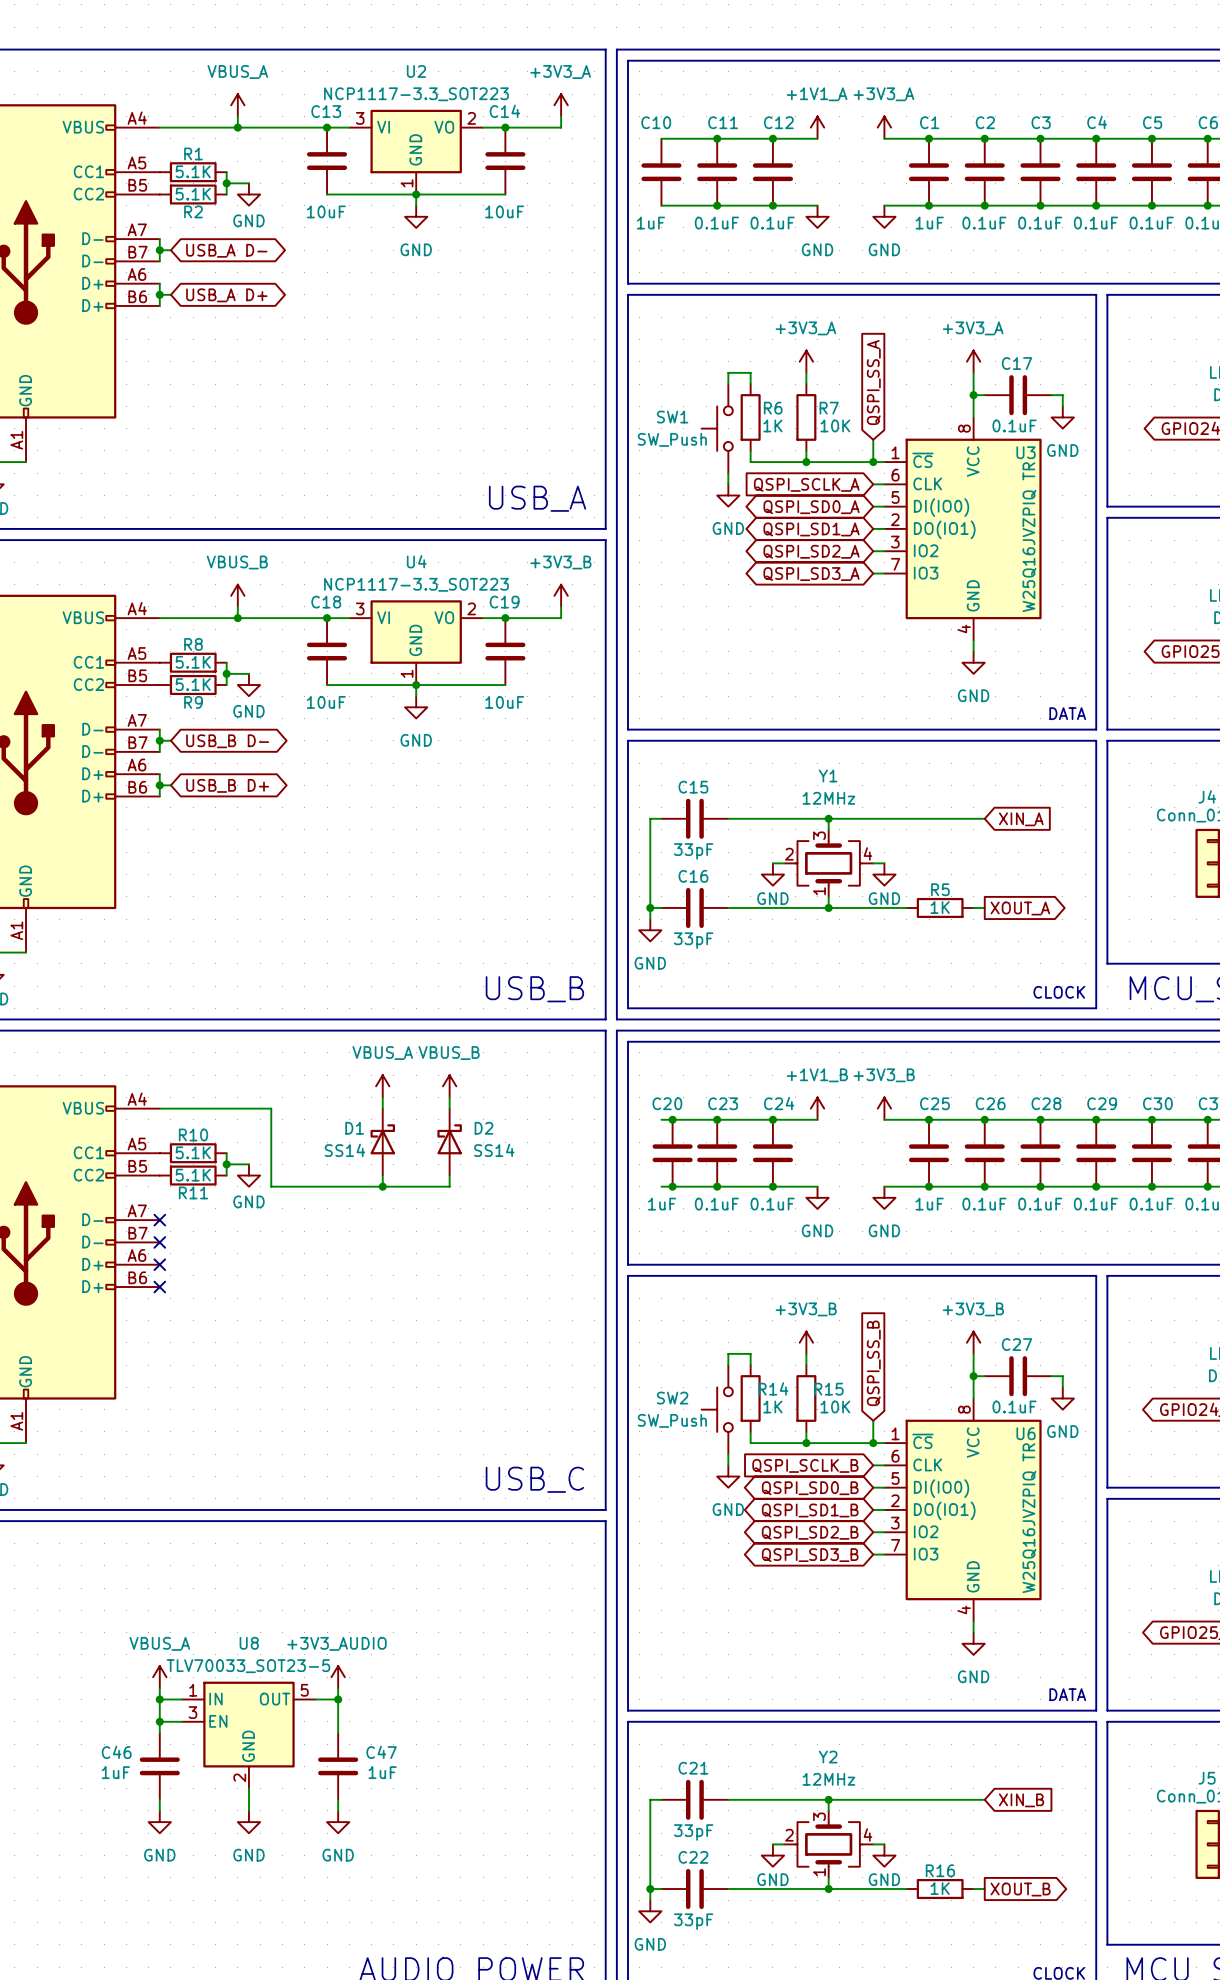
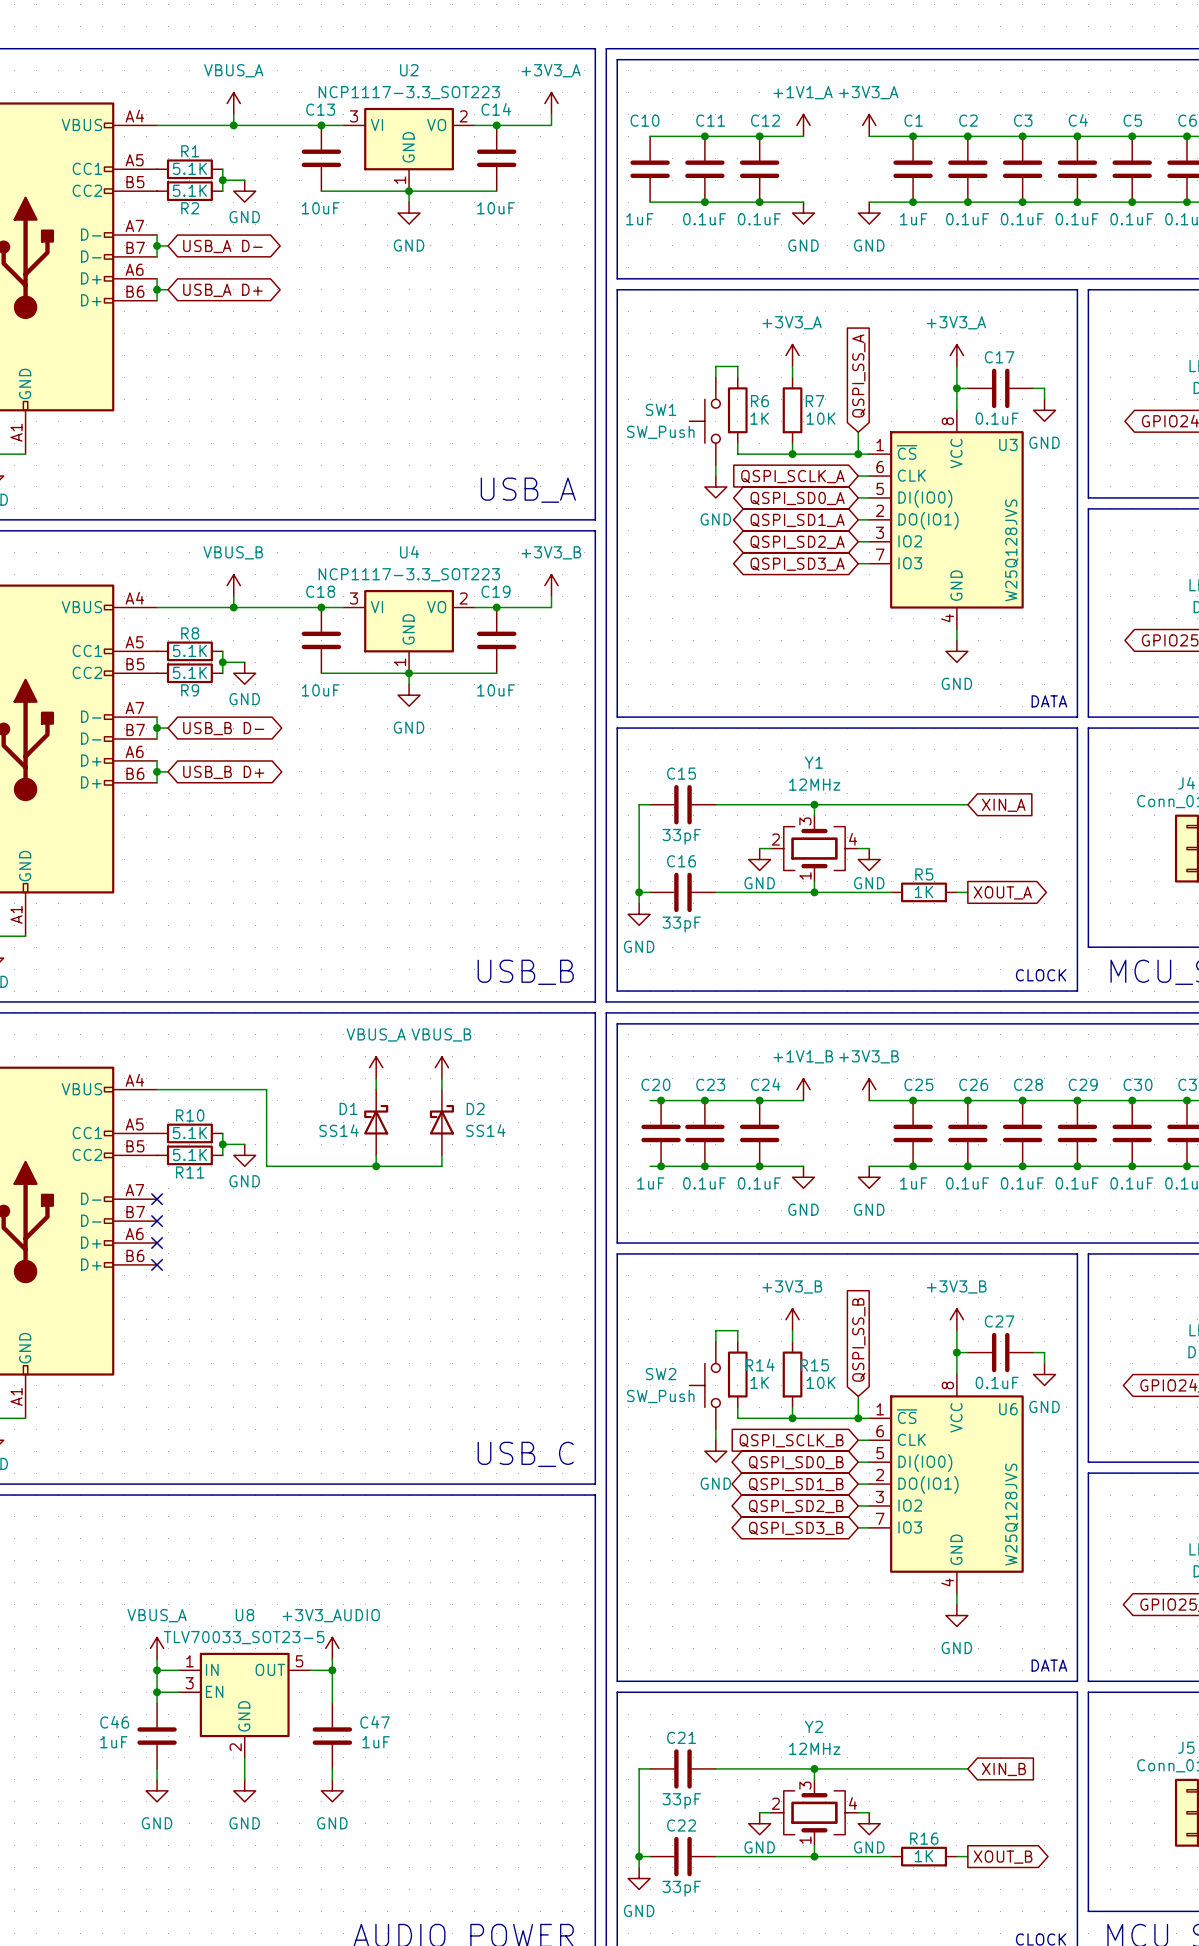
U3 value: W25Q16JVZPIQ TR (1029, 537) -> W25Q128JVS (1011, 550)
U6 value: W25Q16JVZPIQ TR (1029, 1518) -> W25Q128JVS (1011, 1514)

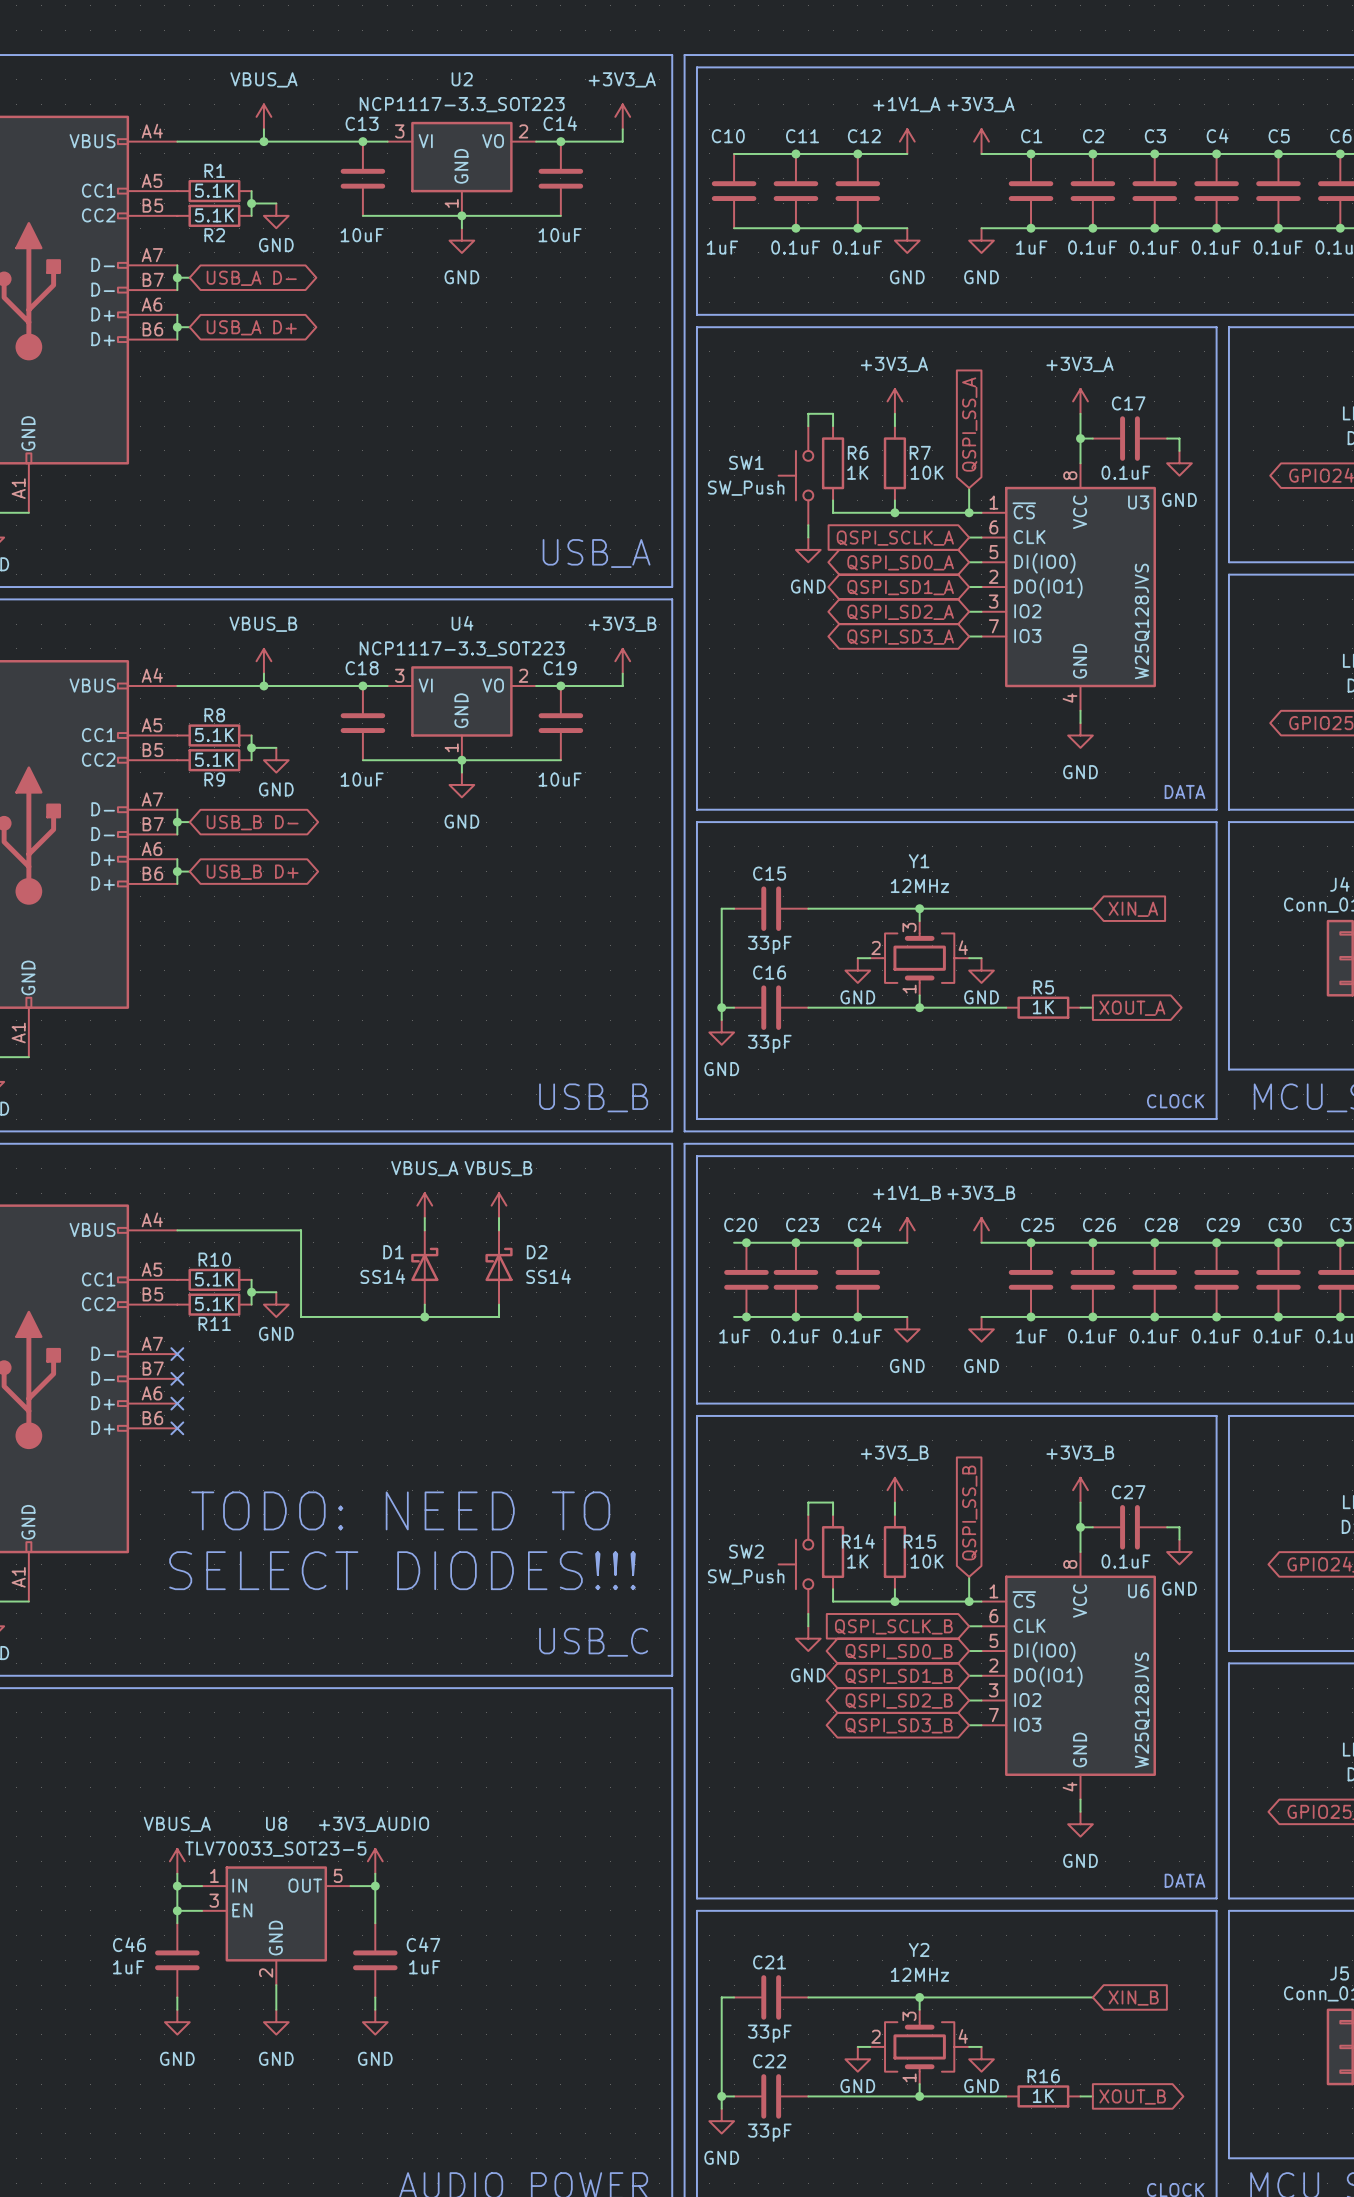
text: none -> TODO: NEED TO (400, 1510)
text: none -> SELECT DIODES!!! (402, 1570)

